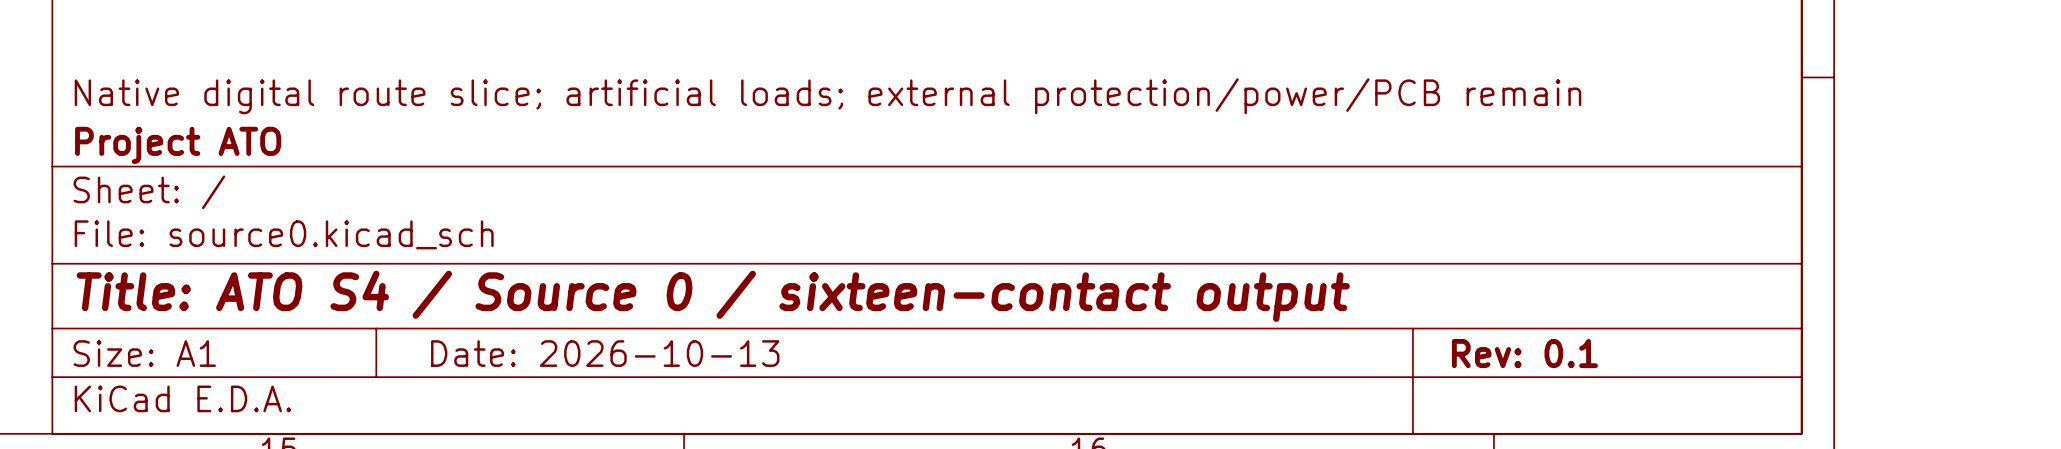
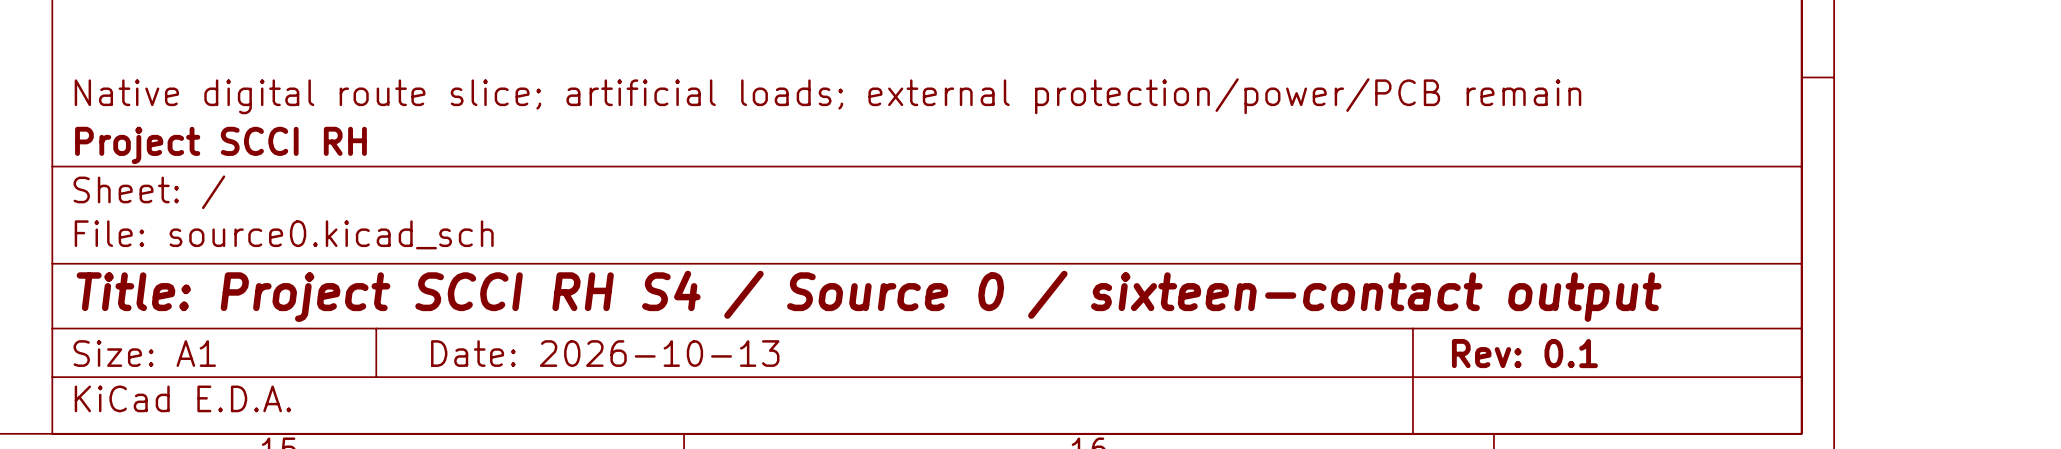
title block: Project ATO (178, 145) -> Project SCCI RH (220, 145)
title block: Title: ATO S4 / Source 0 / sixteen-contact output (713, 296) -> Title: Project SCCI RH S4 / Source 0 / sixteen-contact output (869, 296)

